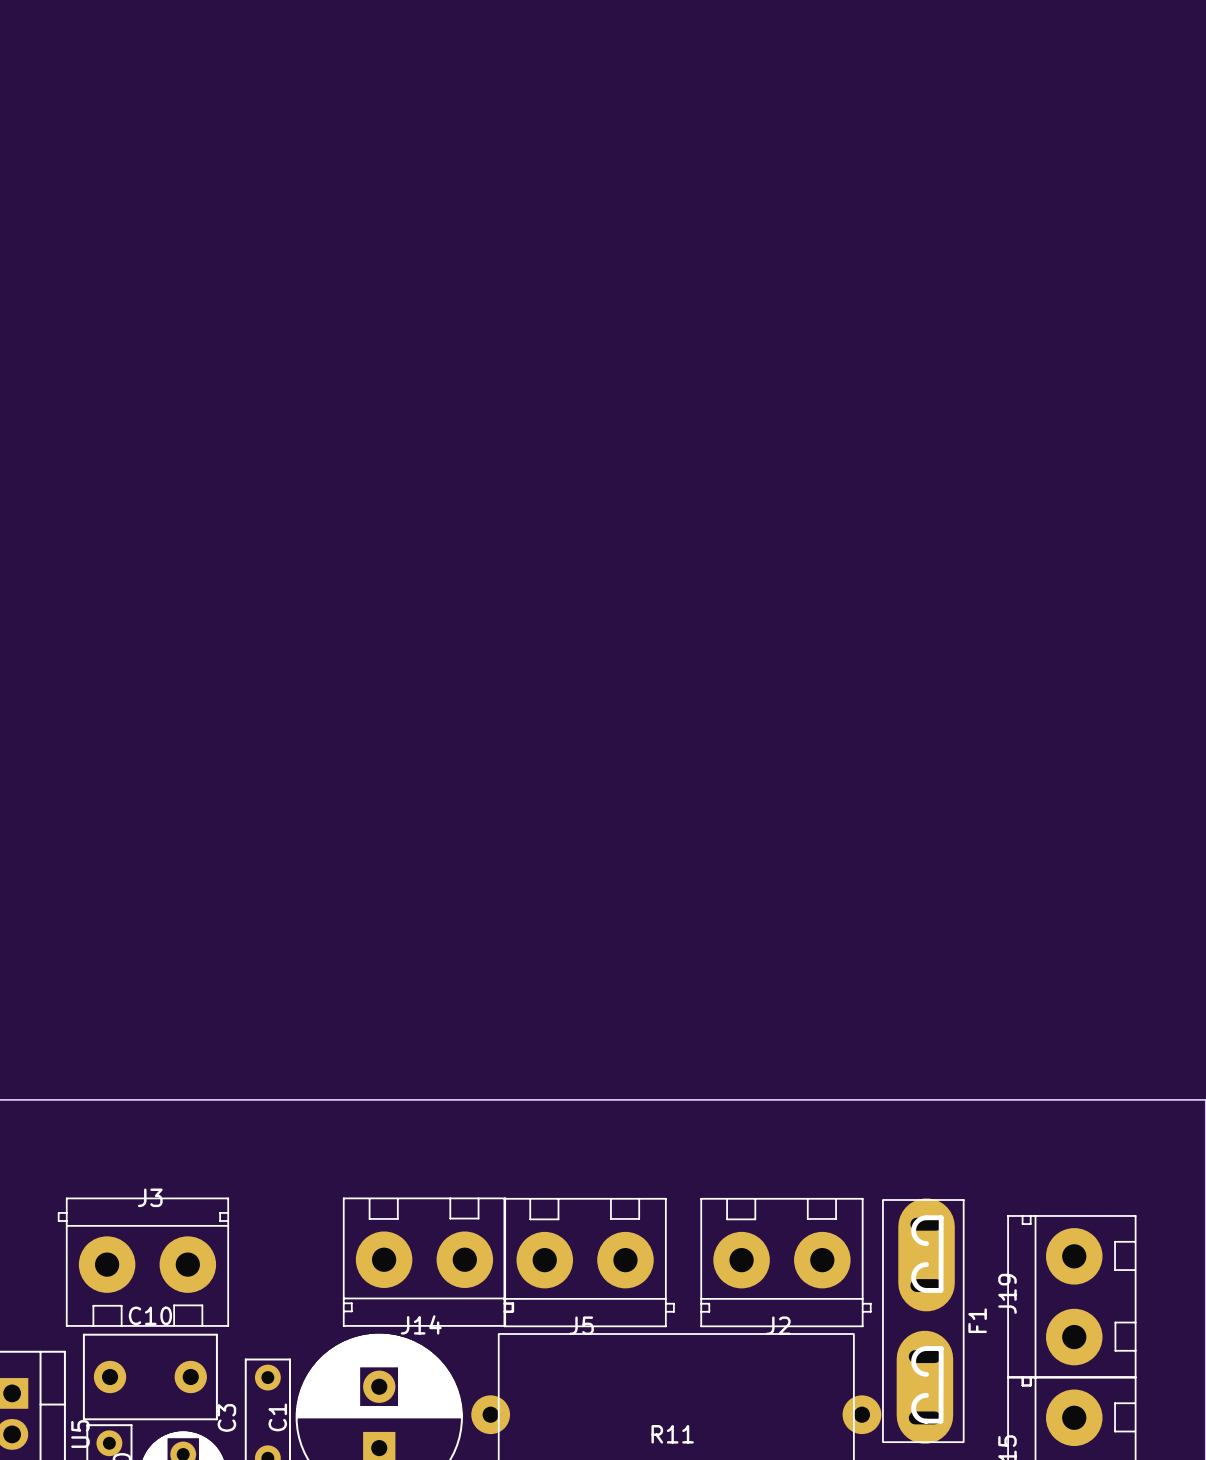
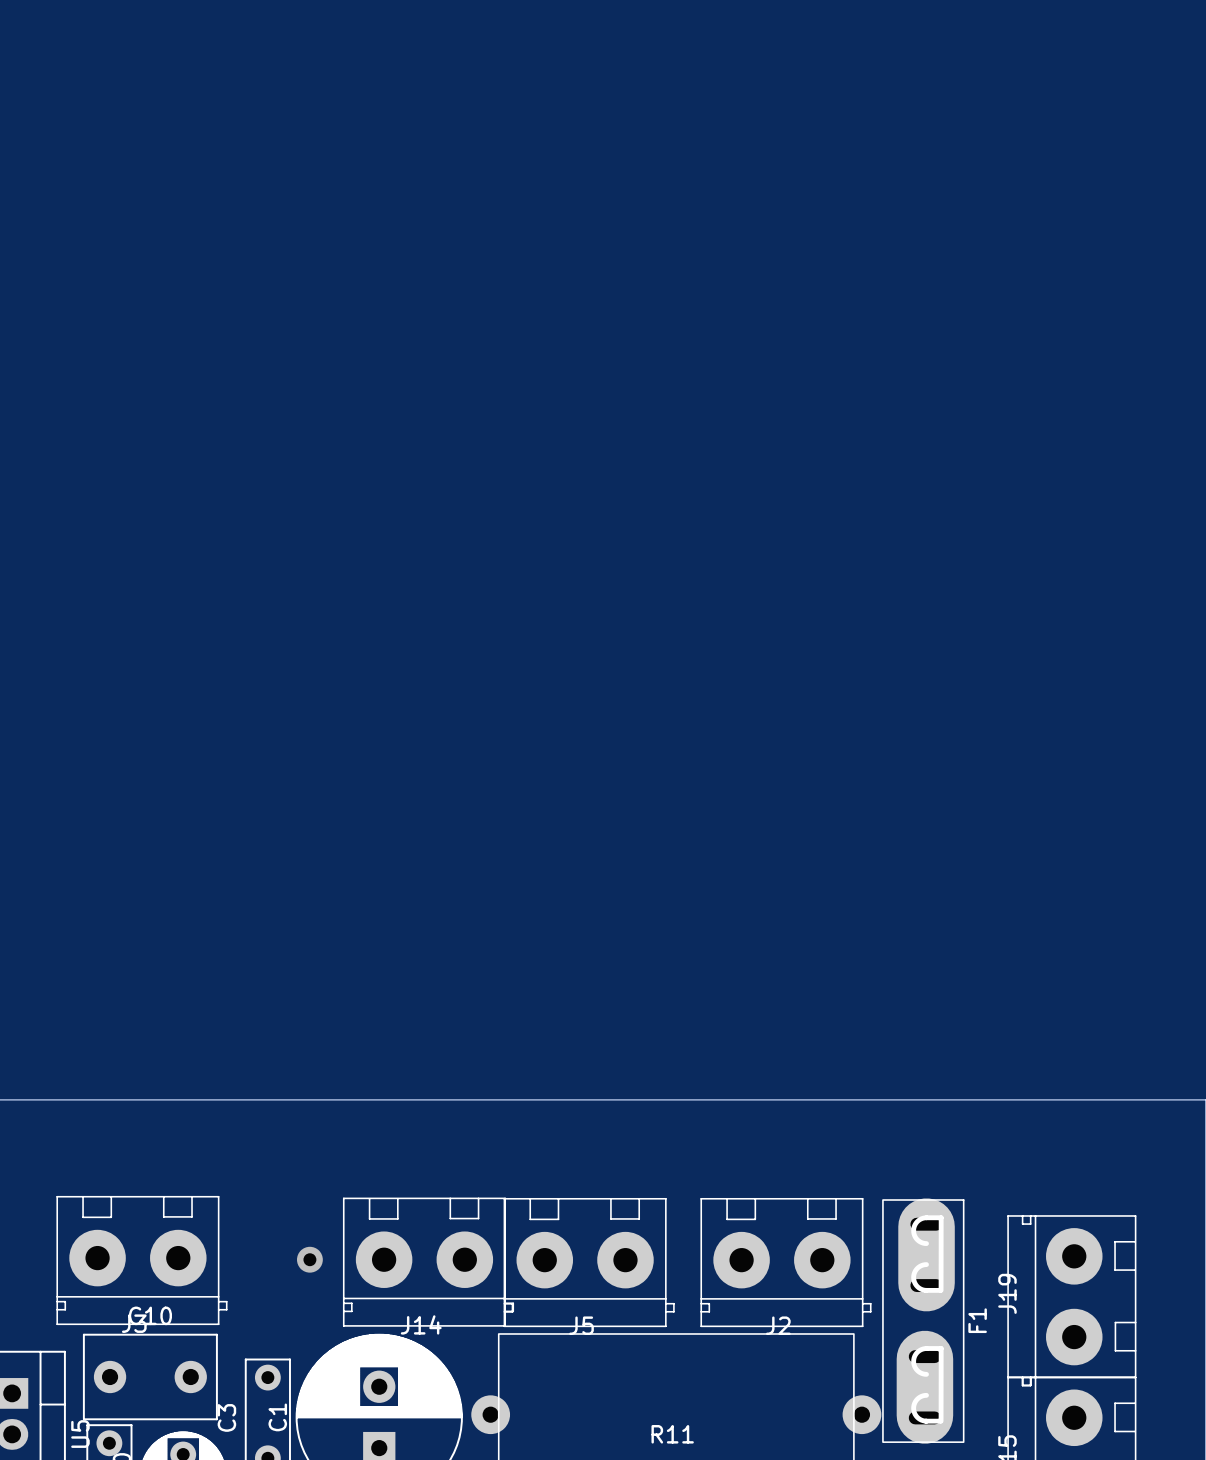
via: none -> (309, 1259)
J3 rotation: 0° (143, 1262) -> 180° (141, 1260)

